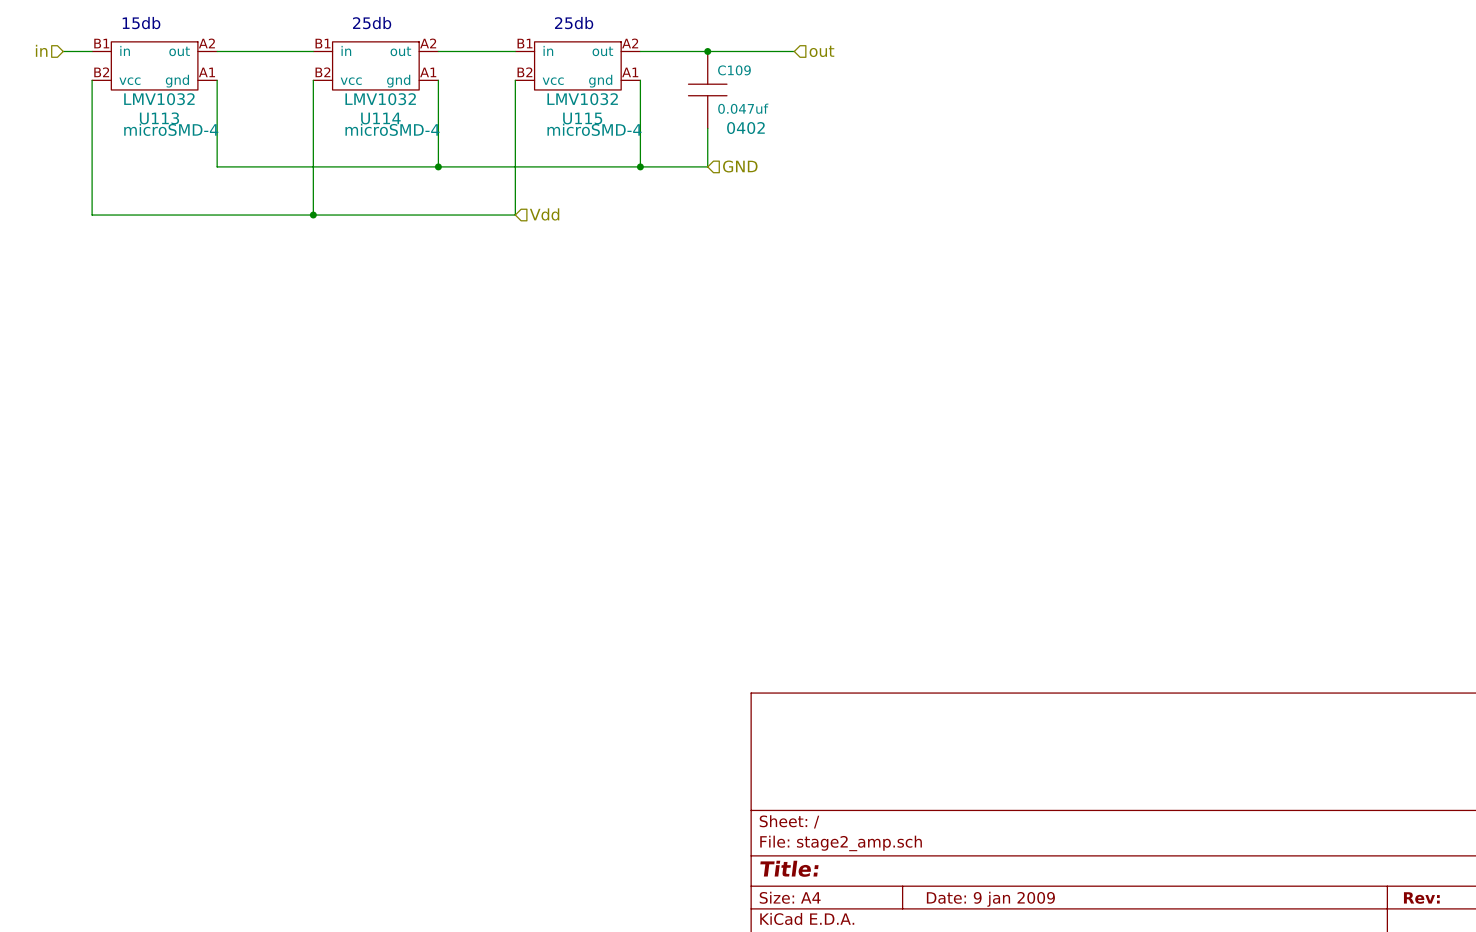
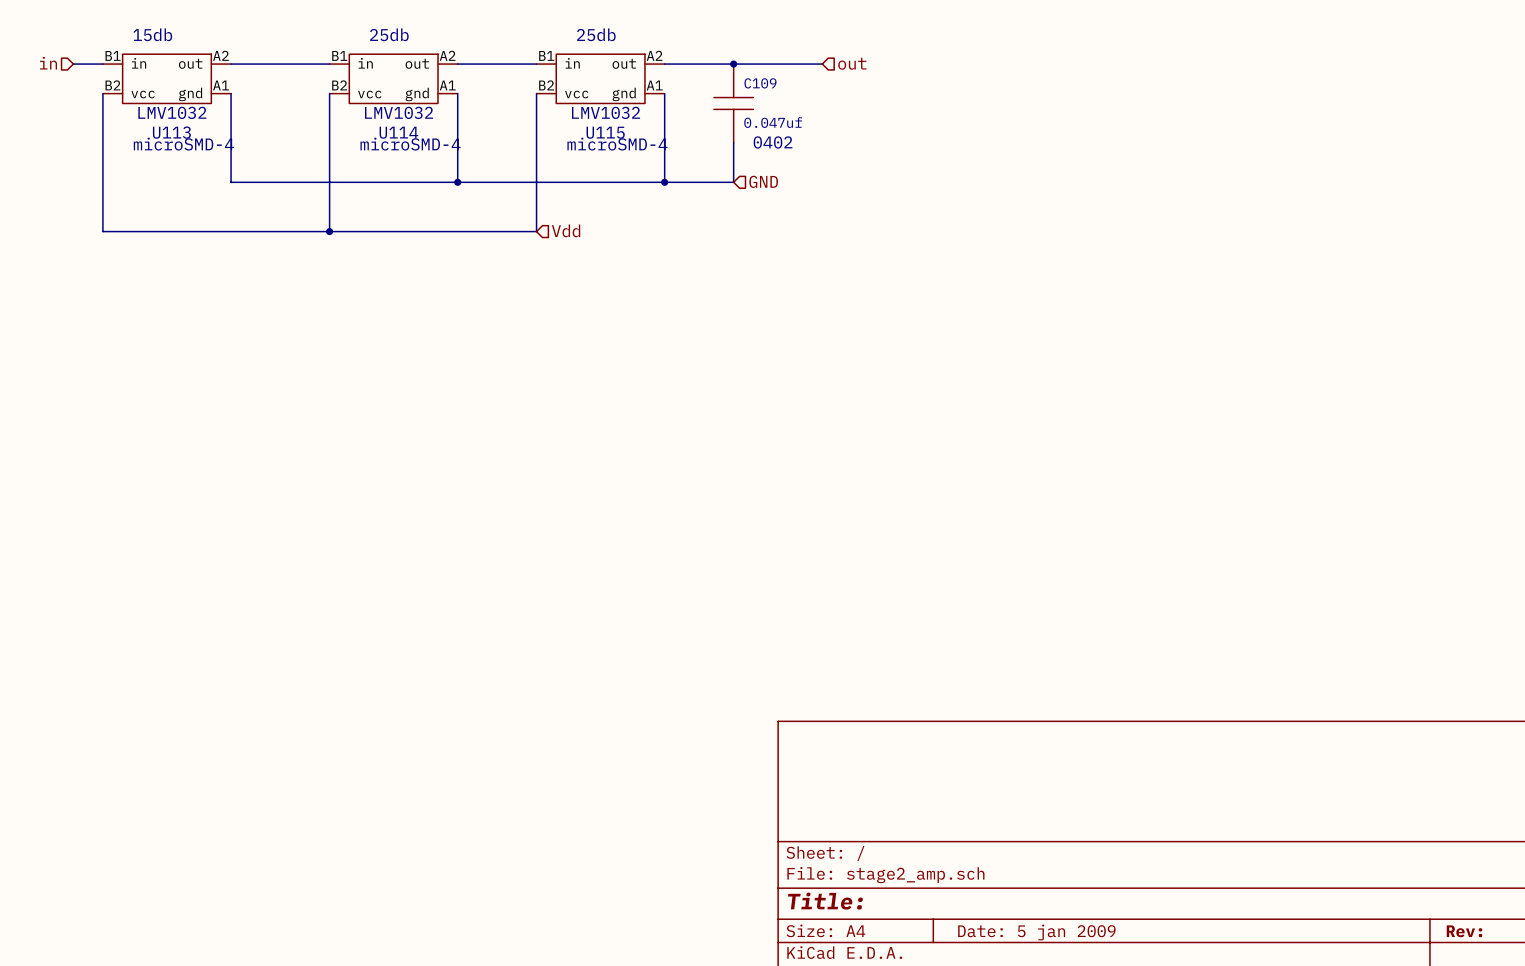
title block: Date: 9 jan 2009 (990, 899) -> Date: 5 jan 2009 (1036, 932)

